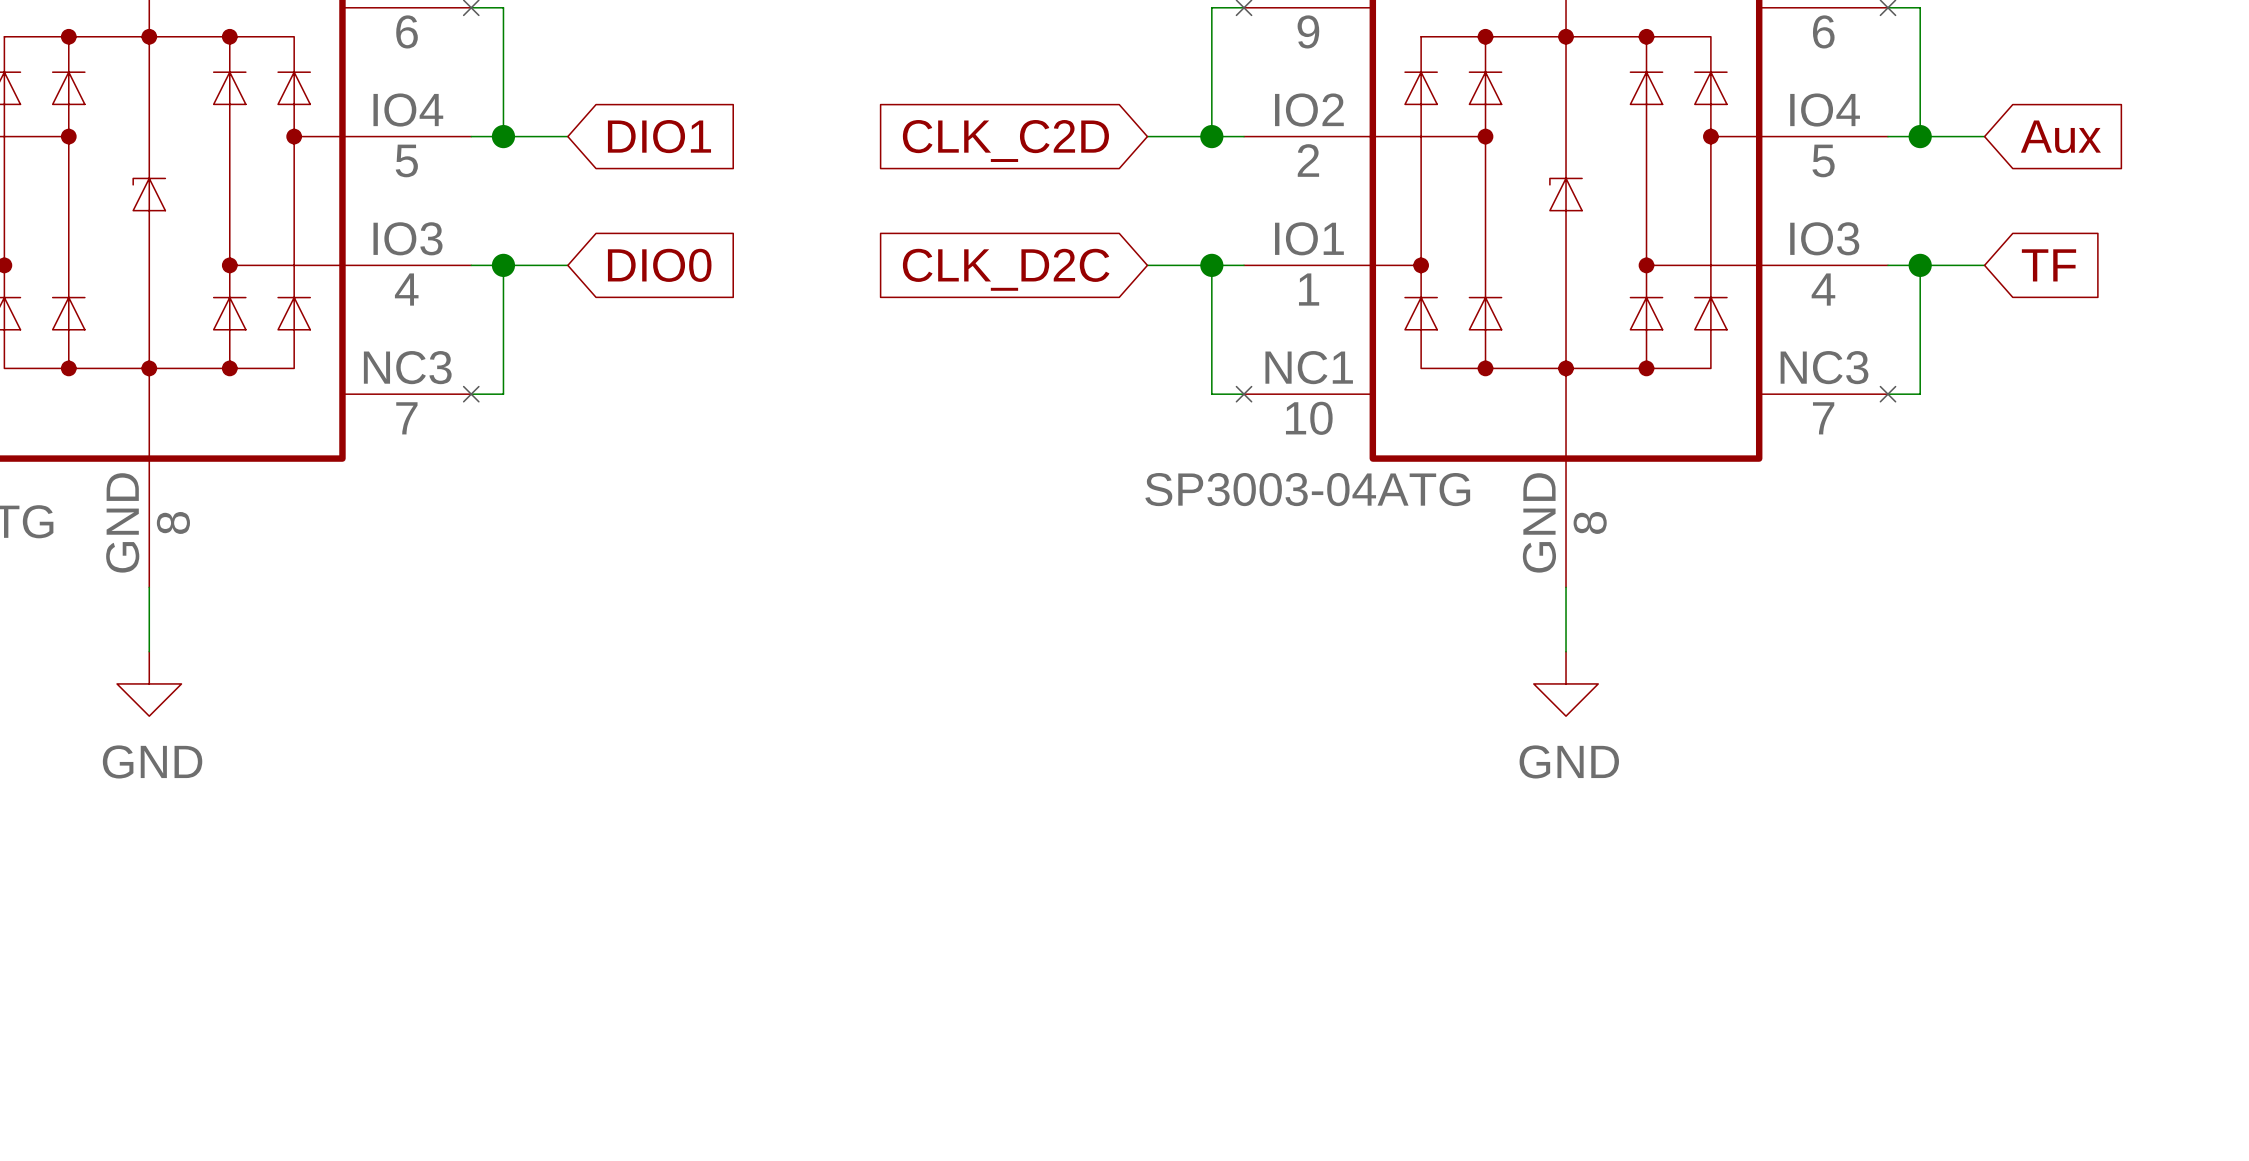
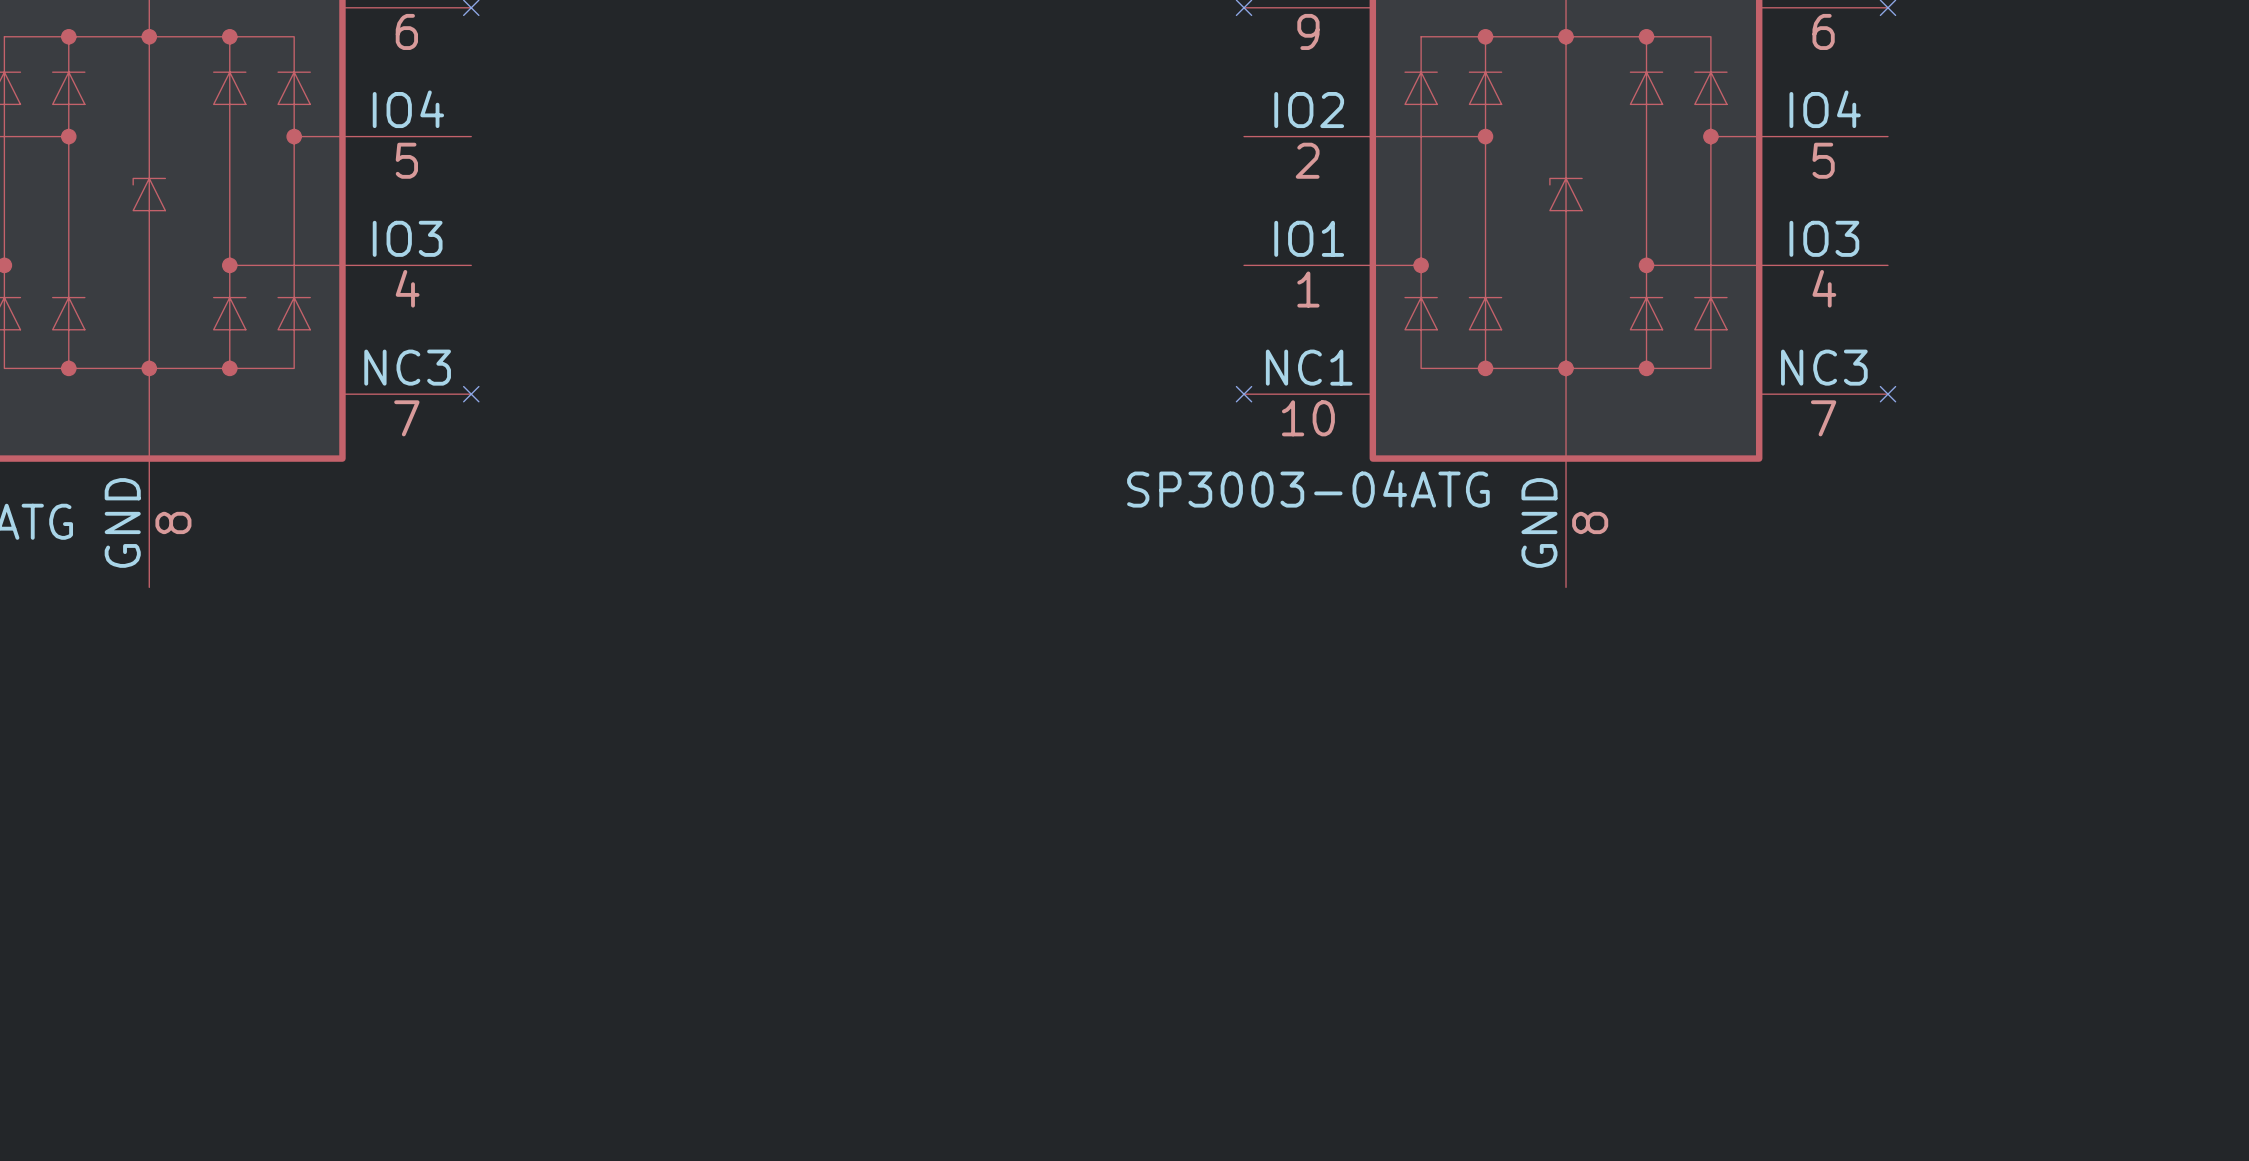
wire: (471, 7) (503, 7) (503, 136) -> none
wire: (1244, 7) (1211, 7) (1211, 136) -> none
wire: (1887, 7) (1920, 7) (1920, 136) -> none
wire: (471, 136) (567, 136) -> none
junction: (503, 136) -> none
global label: DIO1 (659, 136) -> none
wire: (1147, 136) (1244, 136) -> none
junction: (1211, 136) -> none
wire: (1887, 136) (1984, 136) -> none
junction: (1920, 136) -> none
global label: Aux (2060, 136) -> none
global label: CLK_C2D (1005, 140) -> none
wire: (471, 265) (567, 265) -> none
wire: (503, 265) (503, 394) (471, 394) -> none
junction: (503, 265) -> none
global label: DIO0 (659, 265) -> none
wire: (1147, 265) (1244, 265) -> none
wire: (1211, 265) (1211, 394) (1244, 394) -> none
junction: (1211, 265) -> none
wire: (1887, 265) (1984, 265) -> none
wire: (1920, 265) (1920, 394) (1887, 394) -> none
junction: (1920, 265) -> none
global label: TF (2048, 265) -> none
global label: CLK_D2C (1006, 269) -> none
wire: (149, 587) (149, 651) -> none
wire: (1566, 587) (1566, 651) -> none
power symbol: GND (149, 683) -> none
power symbol: GND (1566, 683) -> none

